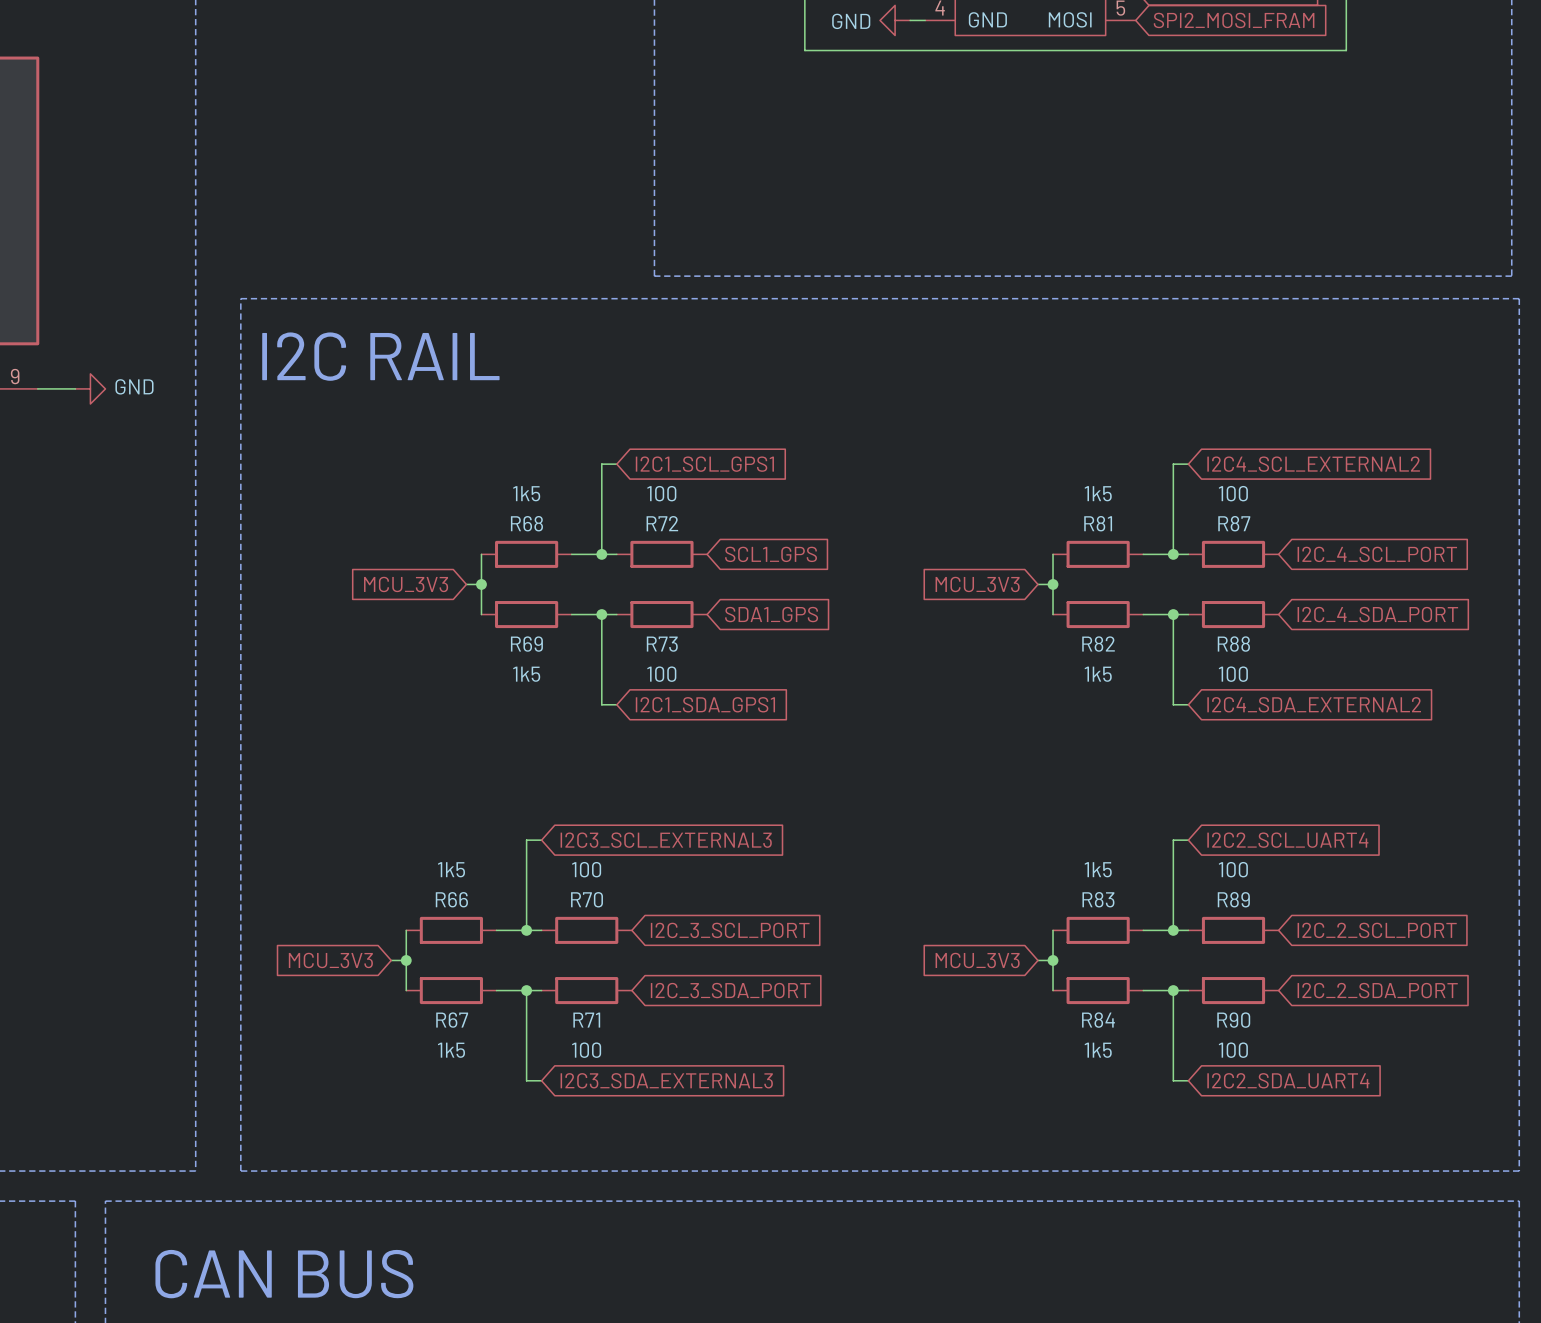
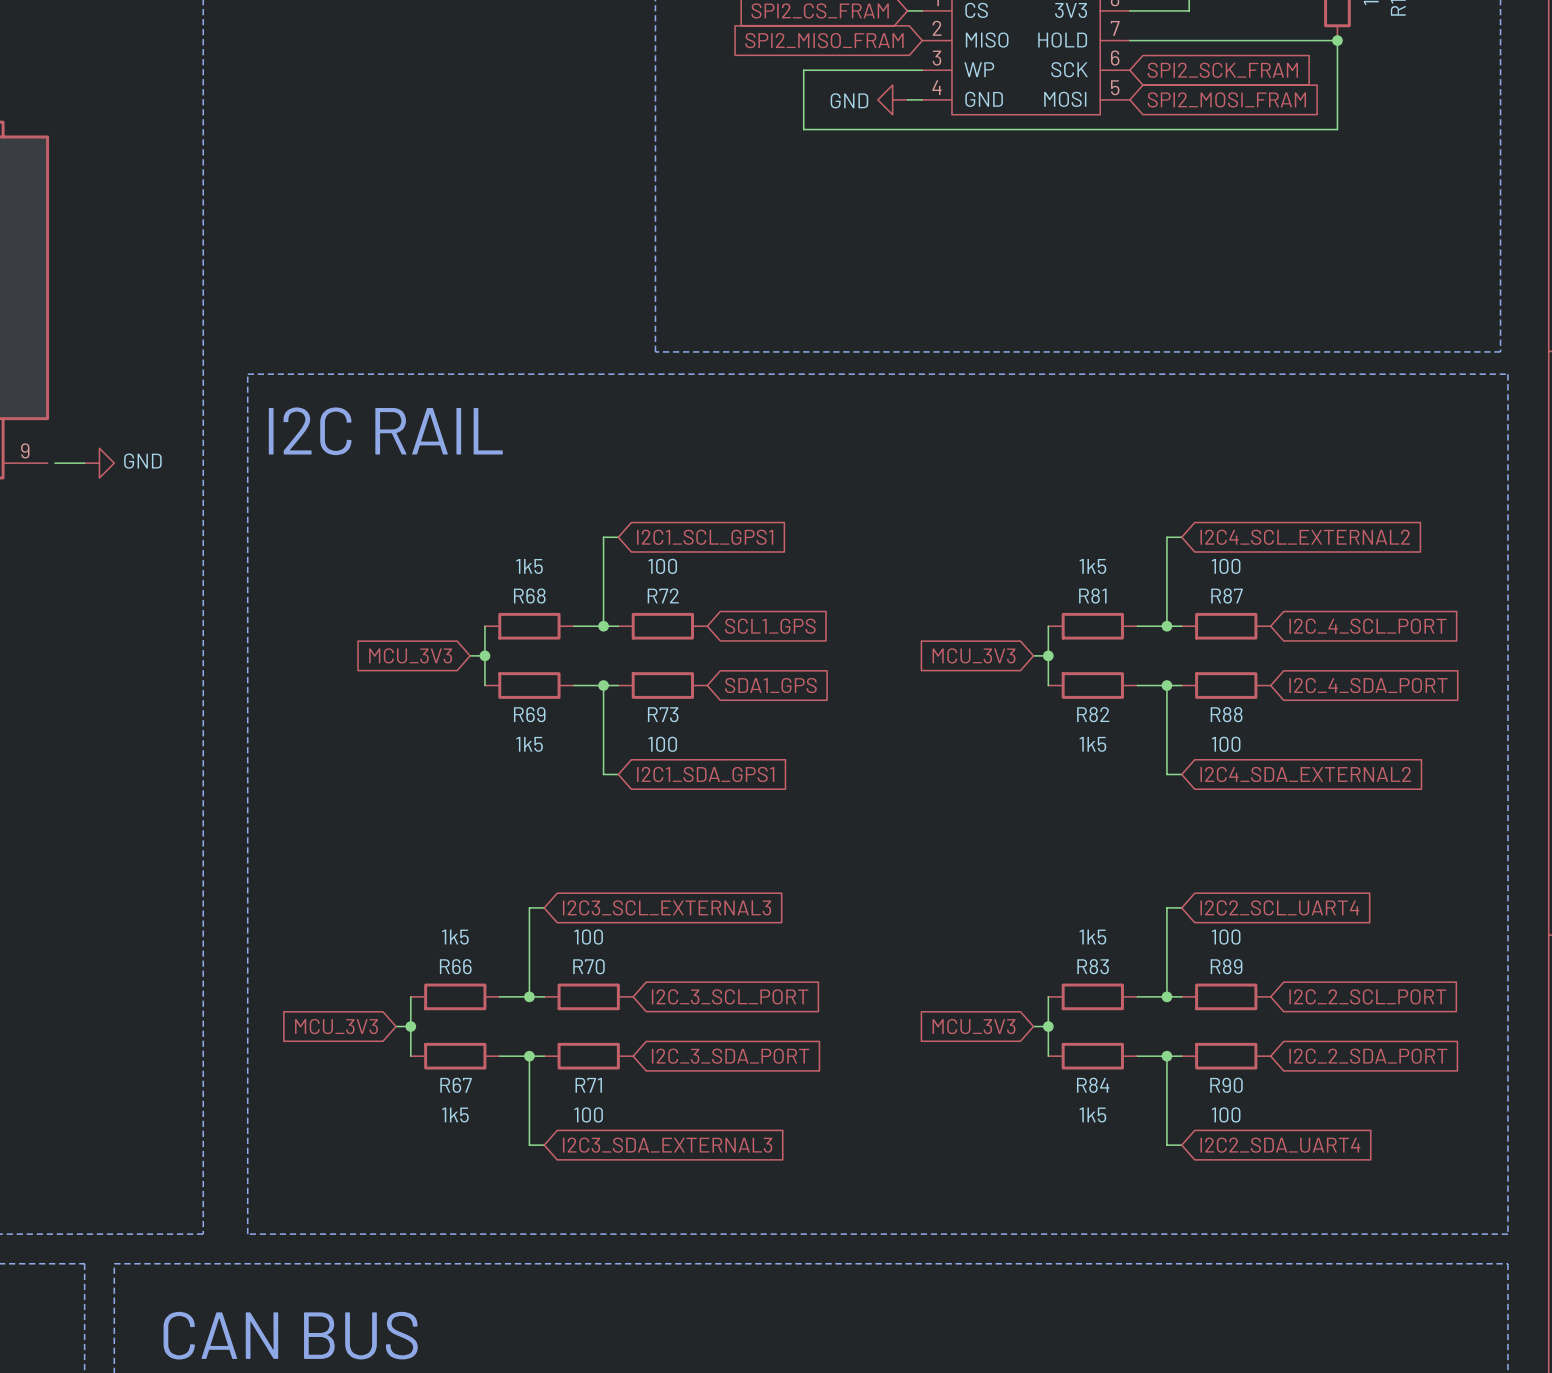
wire: (37, 388) (45, 388) -> none

